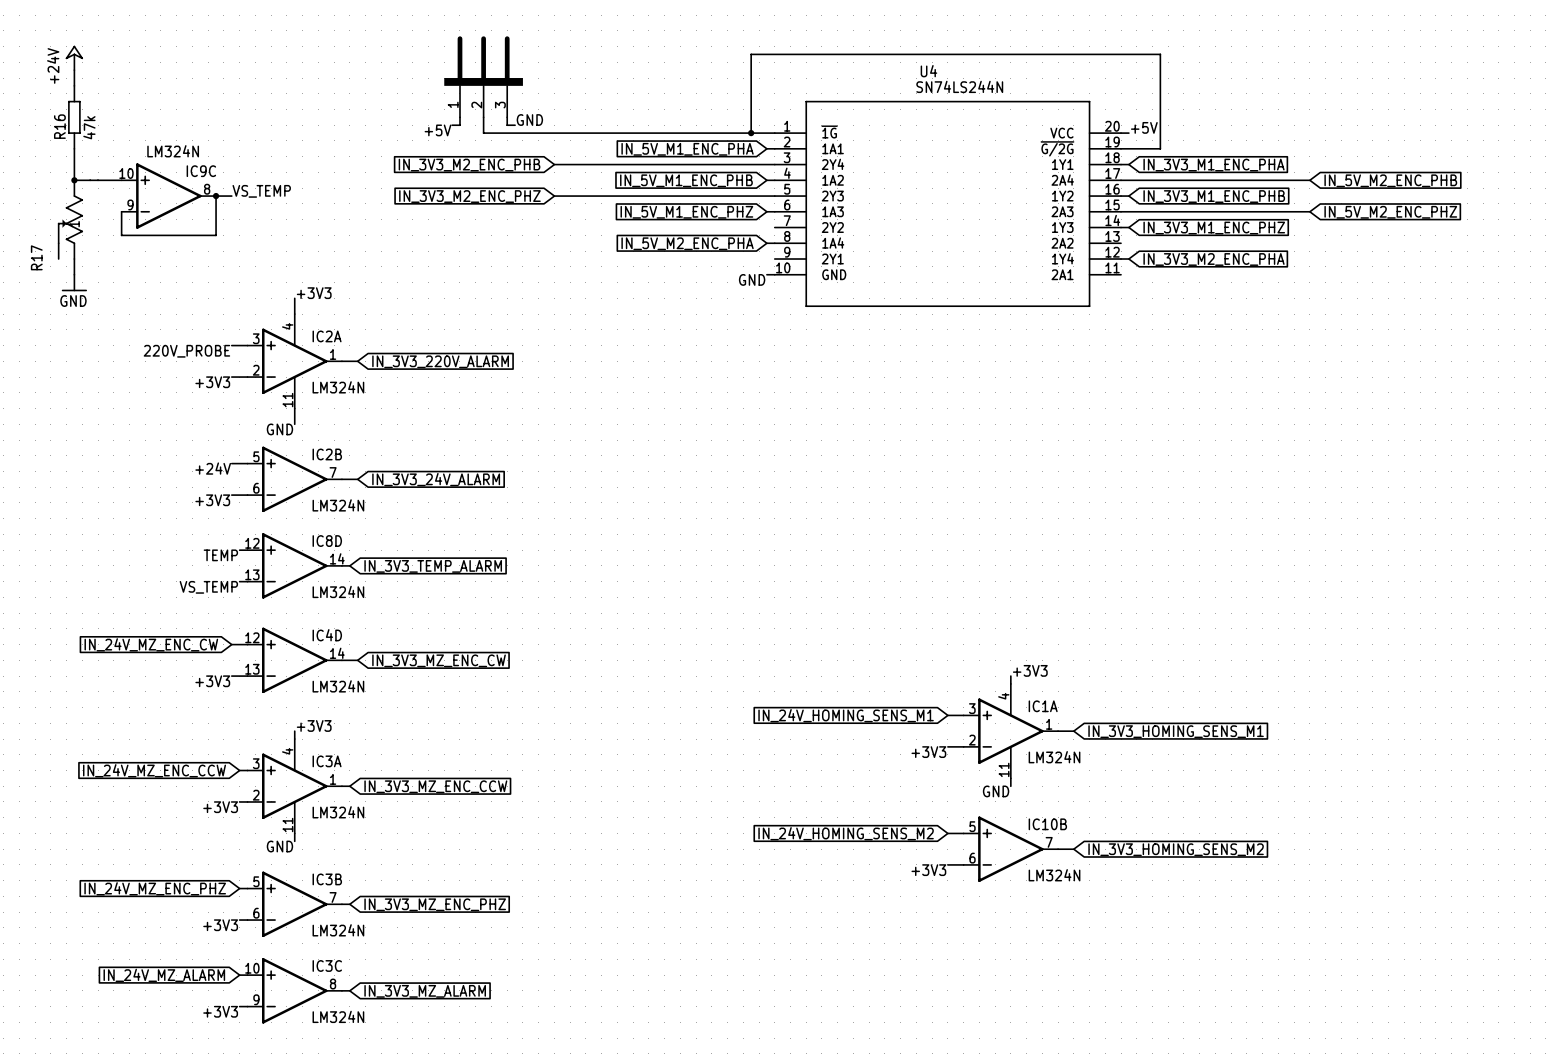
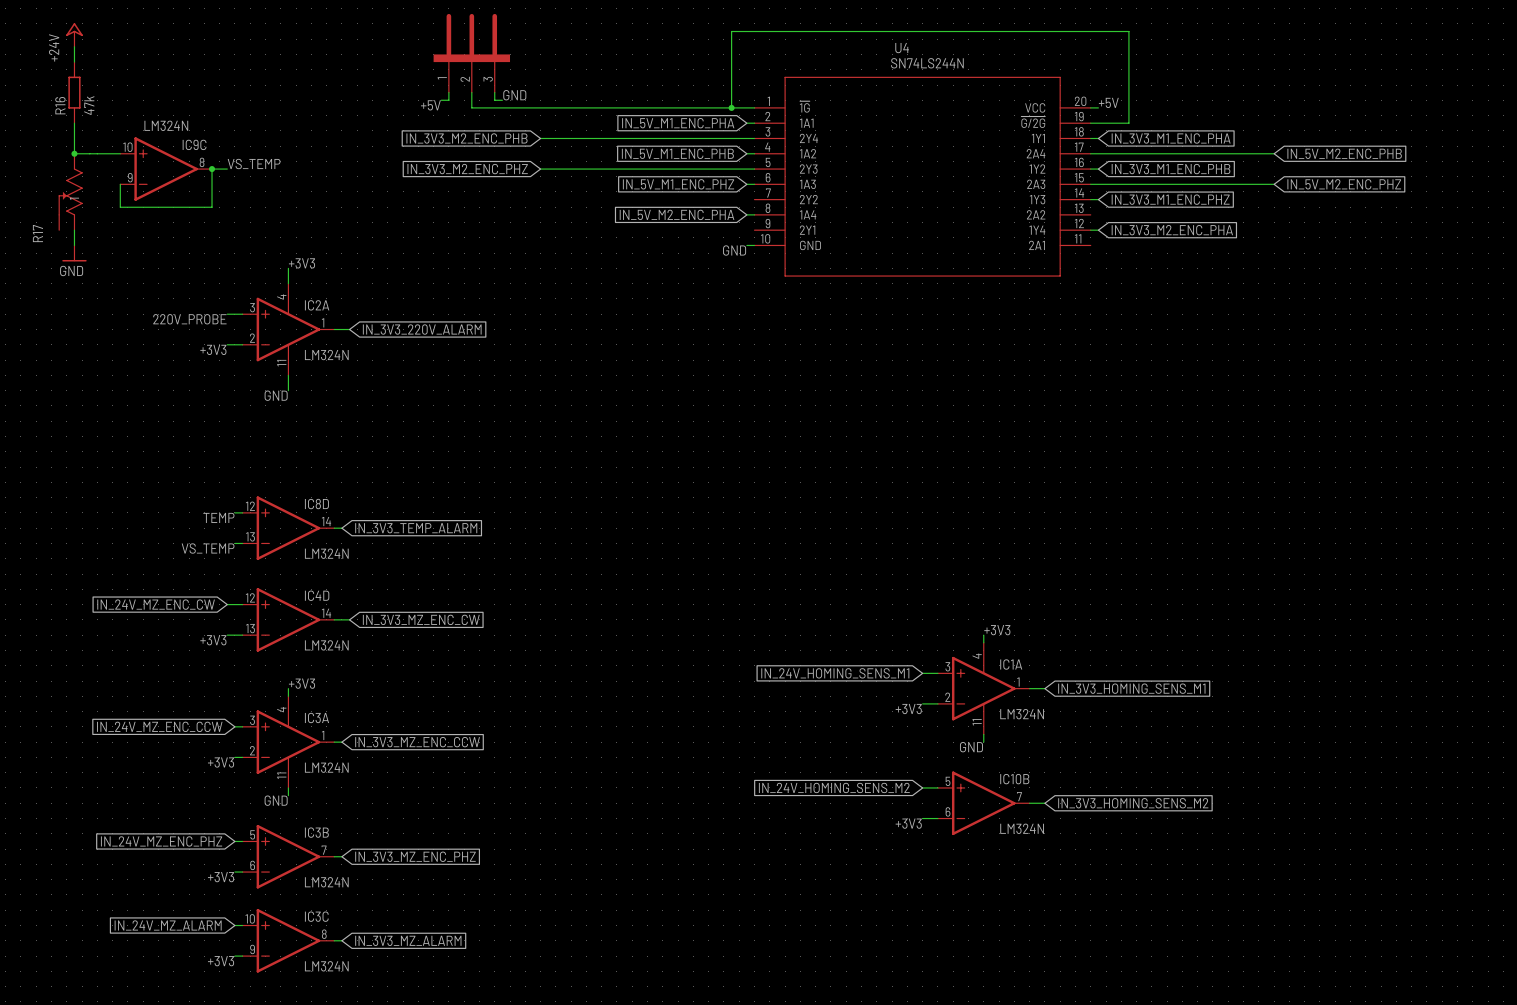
wire: (231, 463) (247, 463) -> none
label: +24V (213, 468) -> none
IC2B: LM324N (294, 479) -> none
wire: (341, 479) (357, 479) -> none
global label: IN_3V3_24V_ALARM (436, 479) -> none
wire: (231, 495) (247, 495) -> none
label: +3V3 (212, 500) -> none

